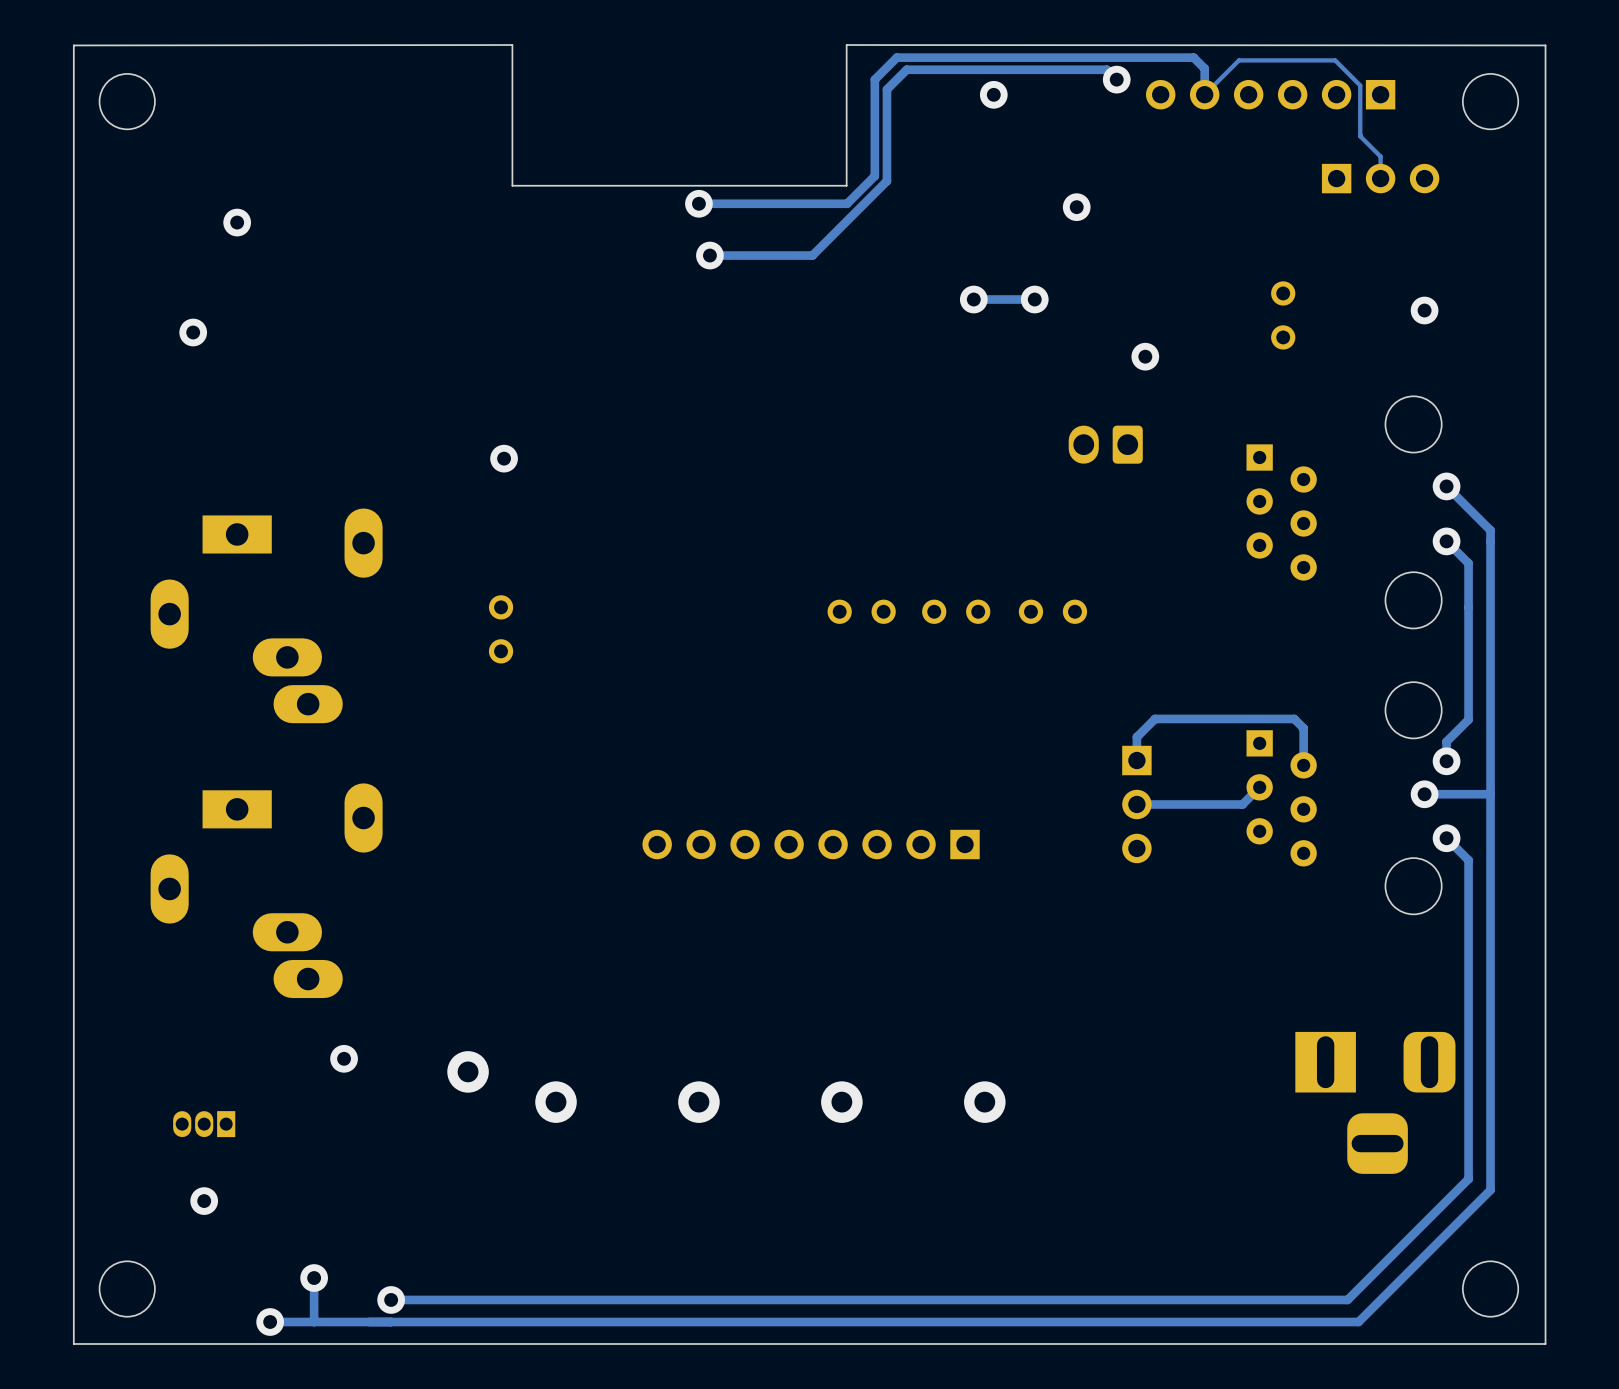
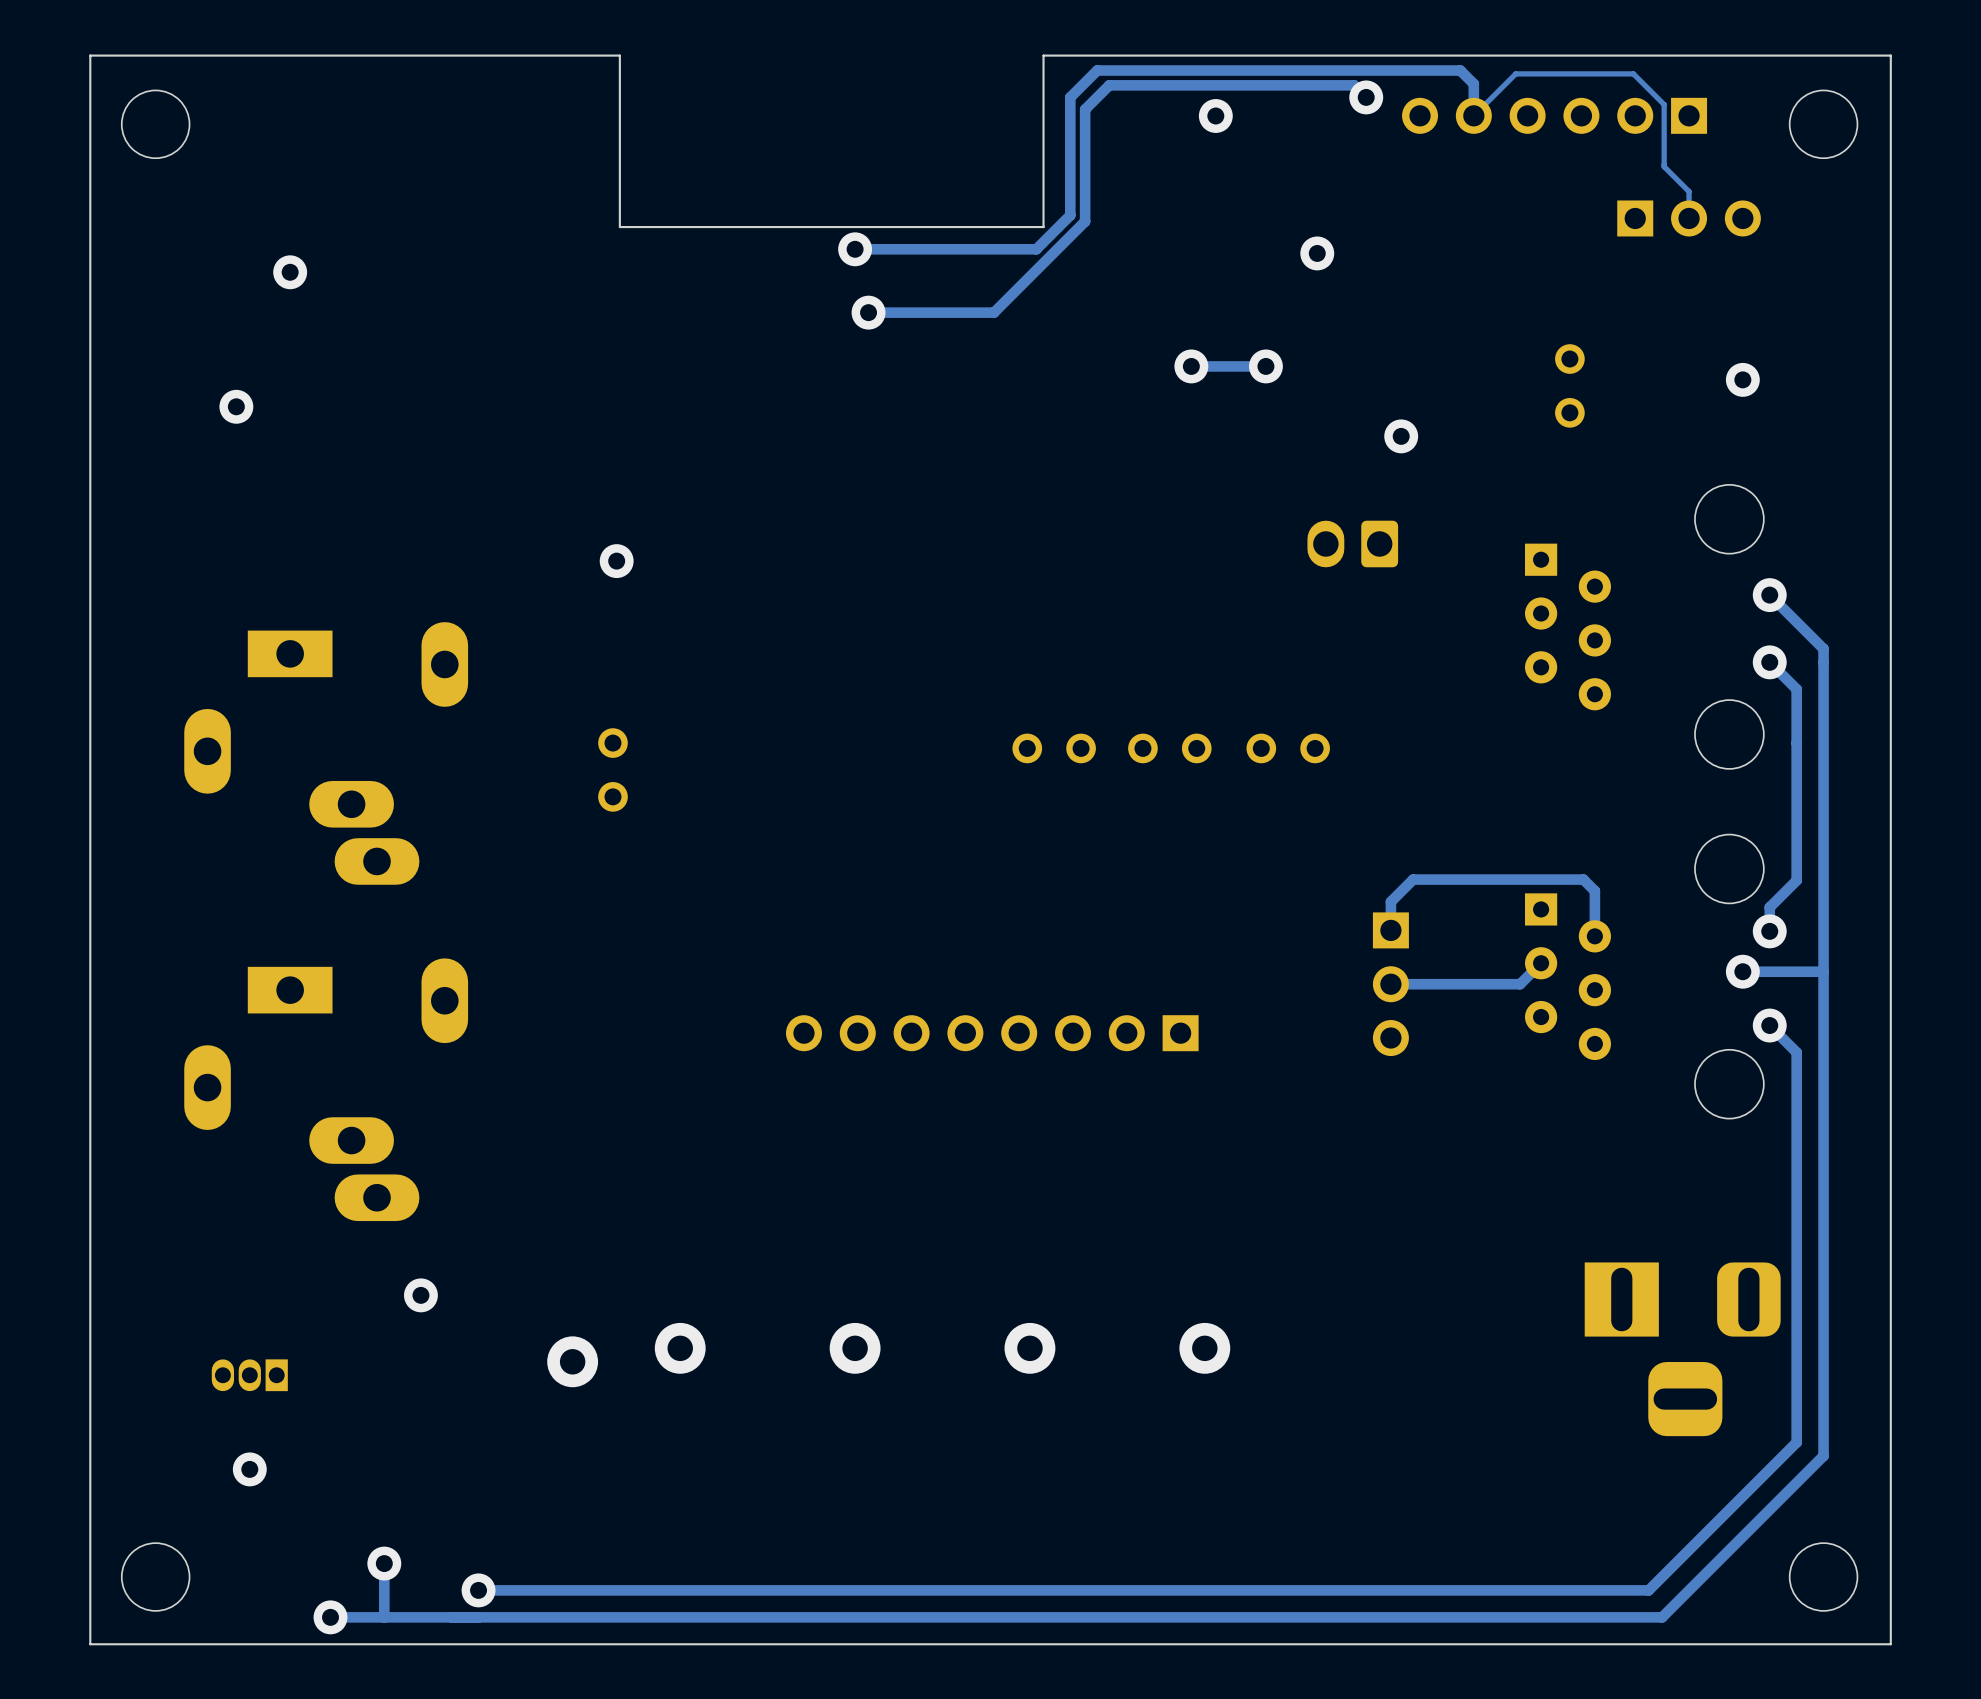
board edge: (512, 45) (73, 45) -> (1043, 227) (619, 227) (619, 55) (90, 55)
board edge: (512, 45) (512, 185) -> none
board edge: (846, 45) (1545, 45) -> (1043, 227) (1043, 55) (1890, 55)
board edge: (846, 45) (846, 185) (512, 185) -> none
via position: (468, 1071) -> (572, 1361)

